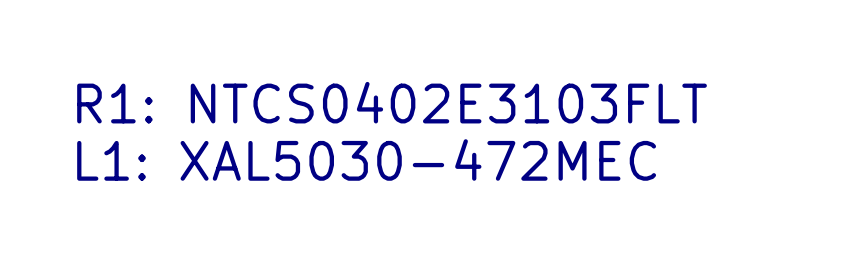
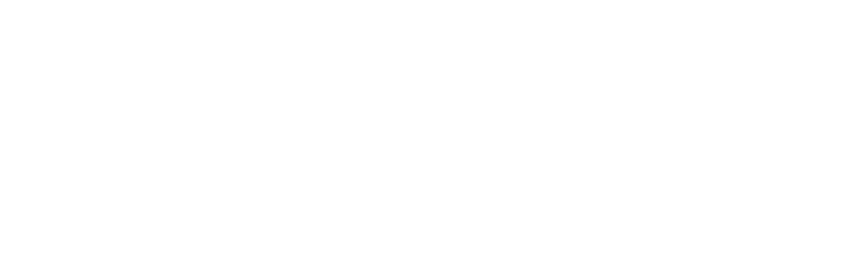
text: R1: NTCS0402E3103FLT (392, 102) -> none
text: L1: XAL5030-472MEC (366, 159) -> none

